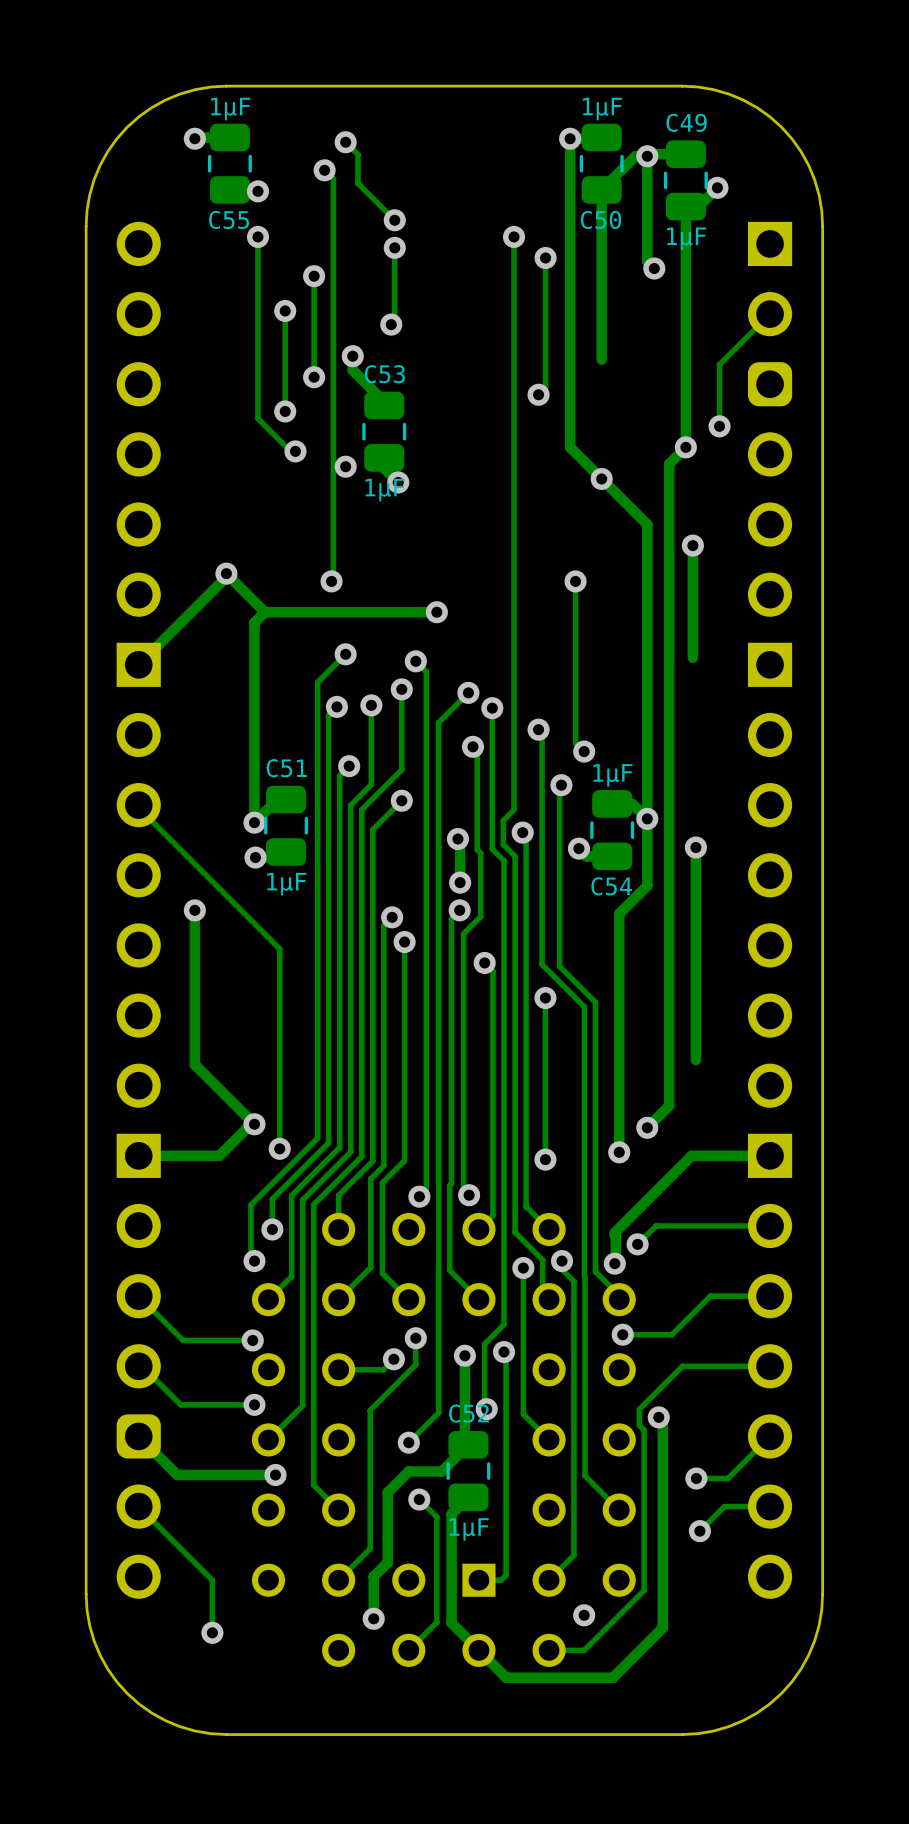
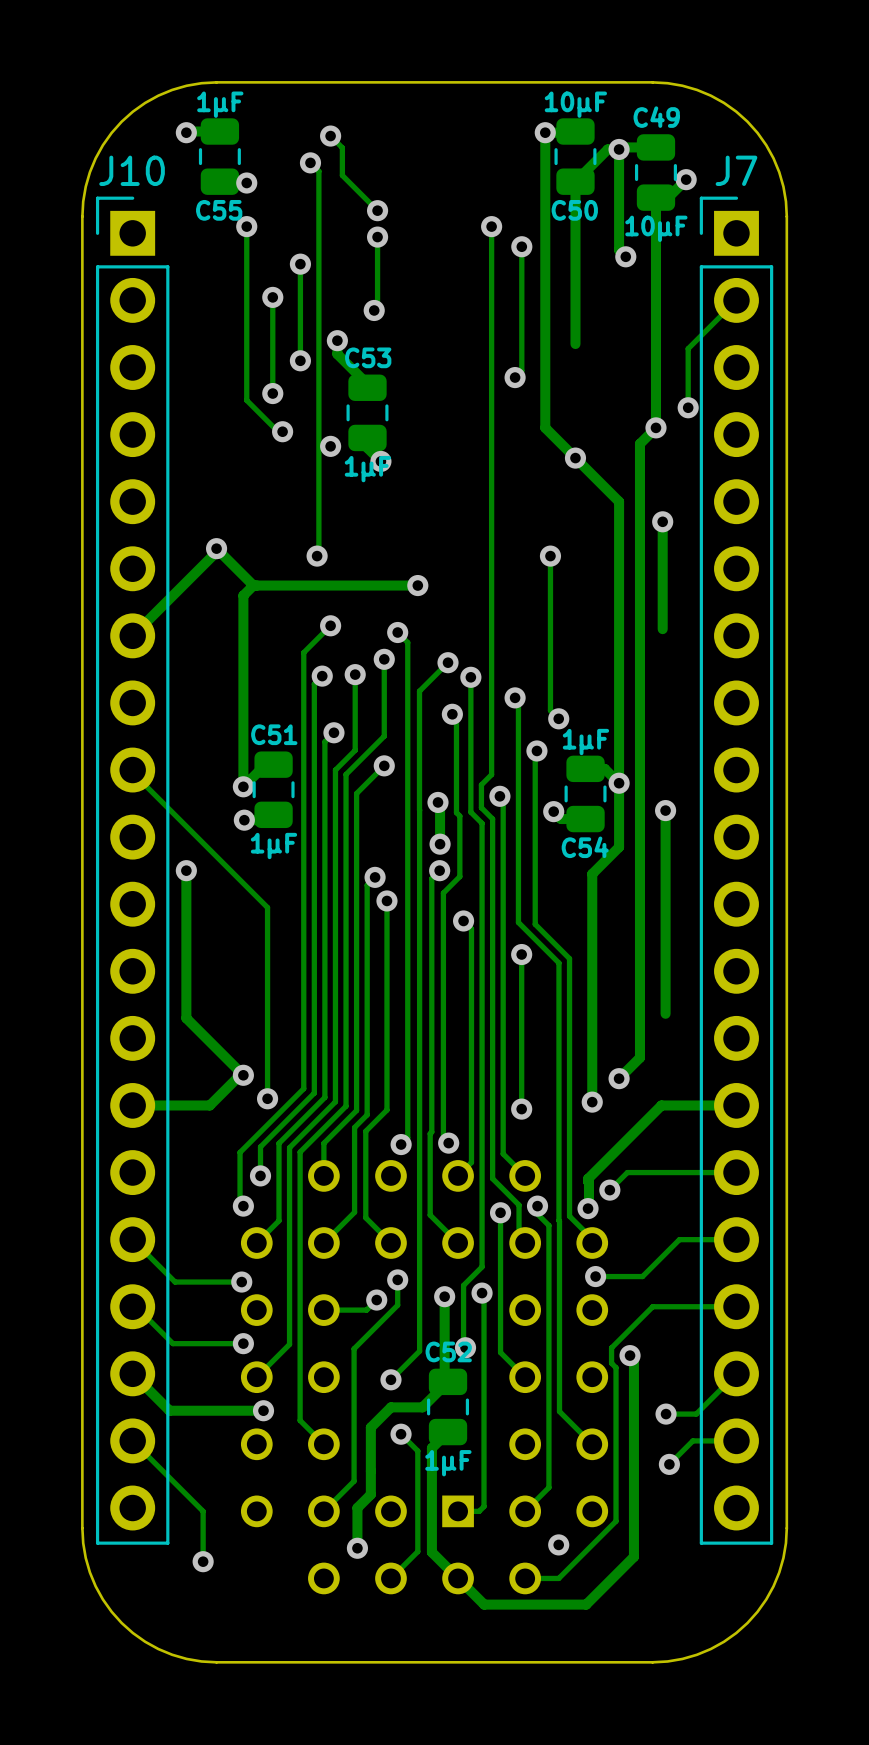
board edge: none -> (652, 82) (201, 83) (172, 89) (145, 102) (132, 111) (121, 121) (102, 145) (89, 172) (85, 186) (82, 216) (82, 1528) (85, 1557) (95, 1586) (102, 1599) (121, 1623) (132, 1633) (158, 1649) (172, 1654) (186, 1658) (216, 1662) (667, 1661) (682, 1658) (710, 1649) (736, 1633) (757, 1611) (773, 1586) (779, 1572) (783, 1557) (786, 1528) (785, 201) (779, 172) (773, 158) (757, 132) (747, 121) (736, 111) (710, 95) (682, 85) (652, 82)
C50 value: 1μF (602, 109) -> 10μF (575, 104)
C49 value: 1μF (686, 238) -> 10μF (656, 228)
J10: none -> (132, 870)
part: (454, 910) -> none
J7: none -> (736, 870)

